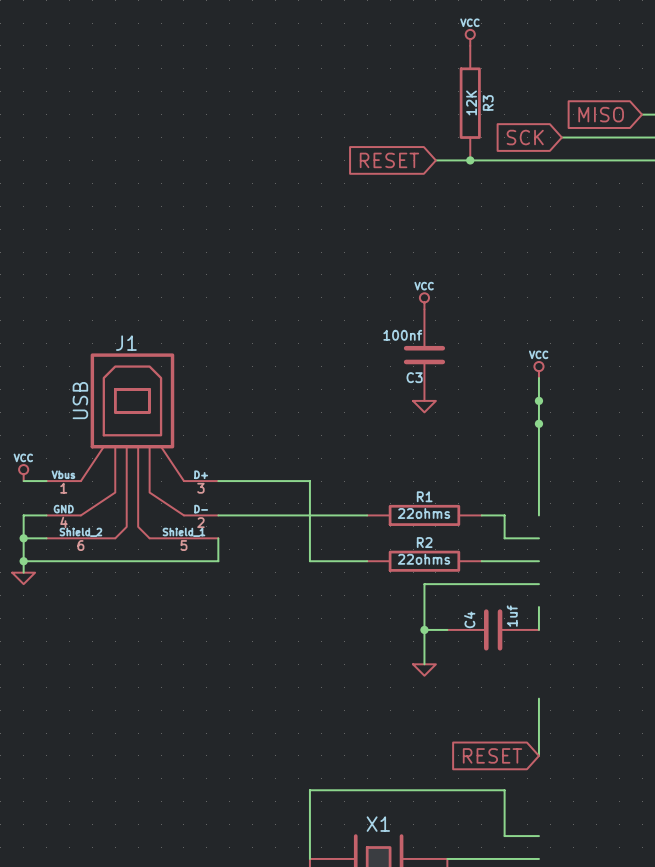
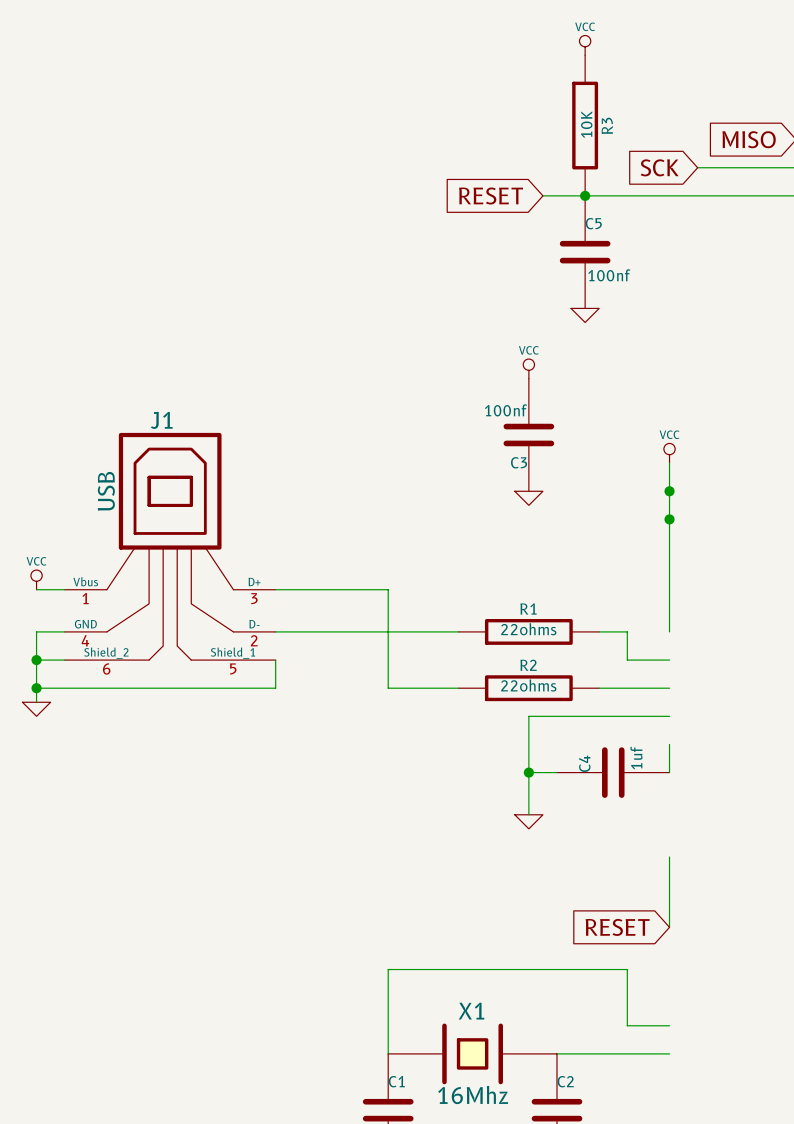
R3 value: 12K (471, 102) -> 10K (586, 124)
C5: none -> 100nf (585, 252)
power symbol: none -> (585, 315)

